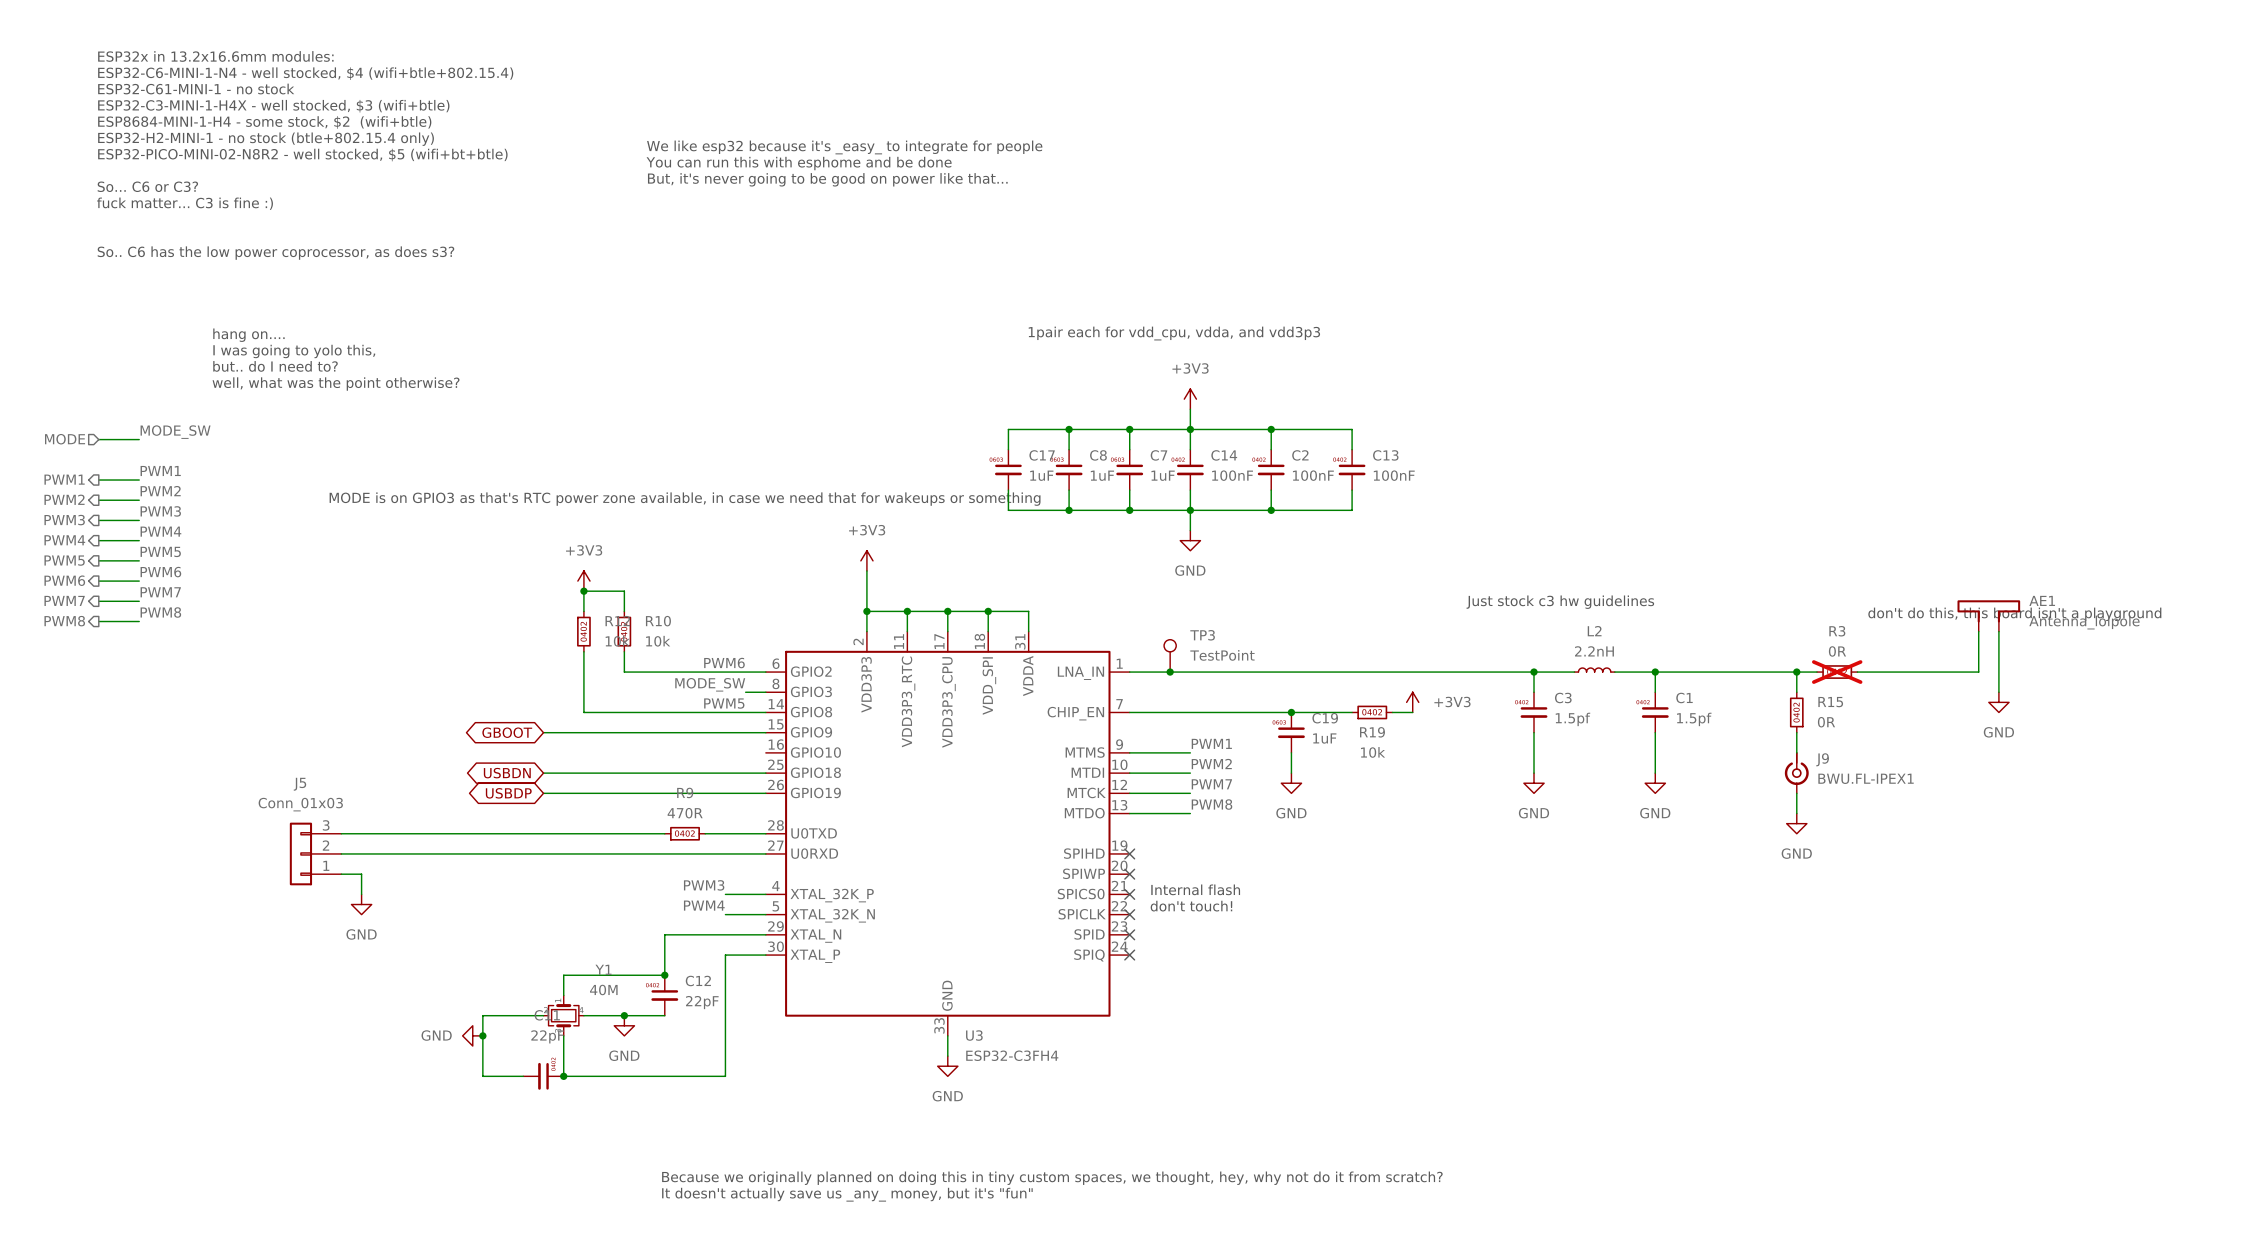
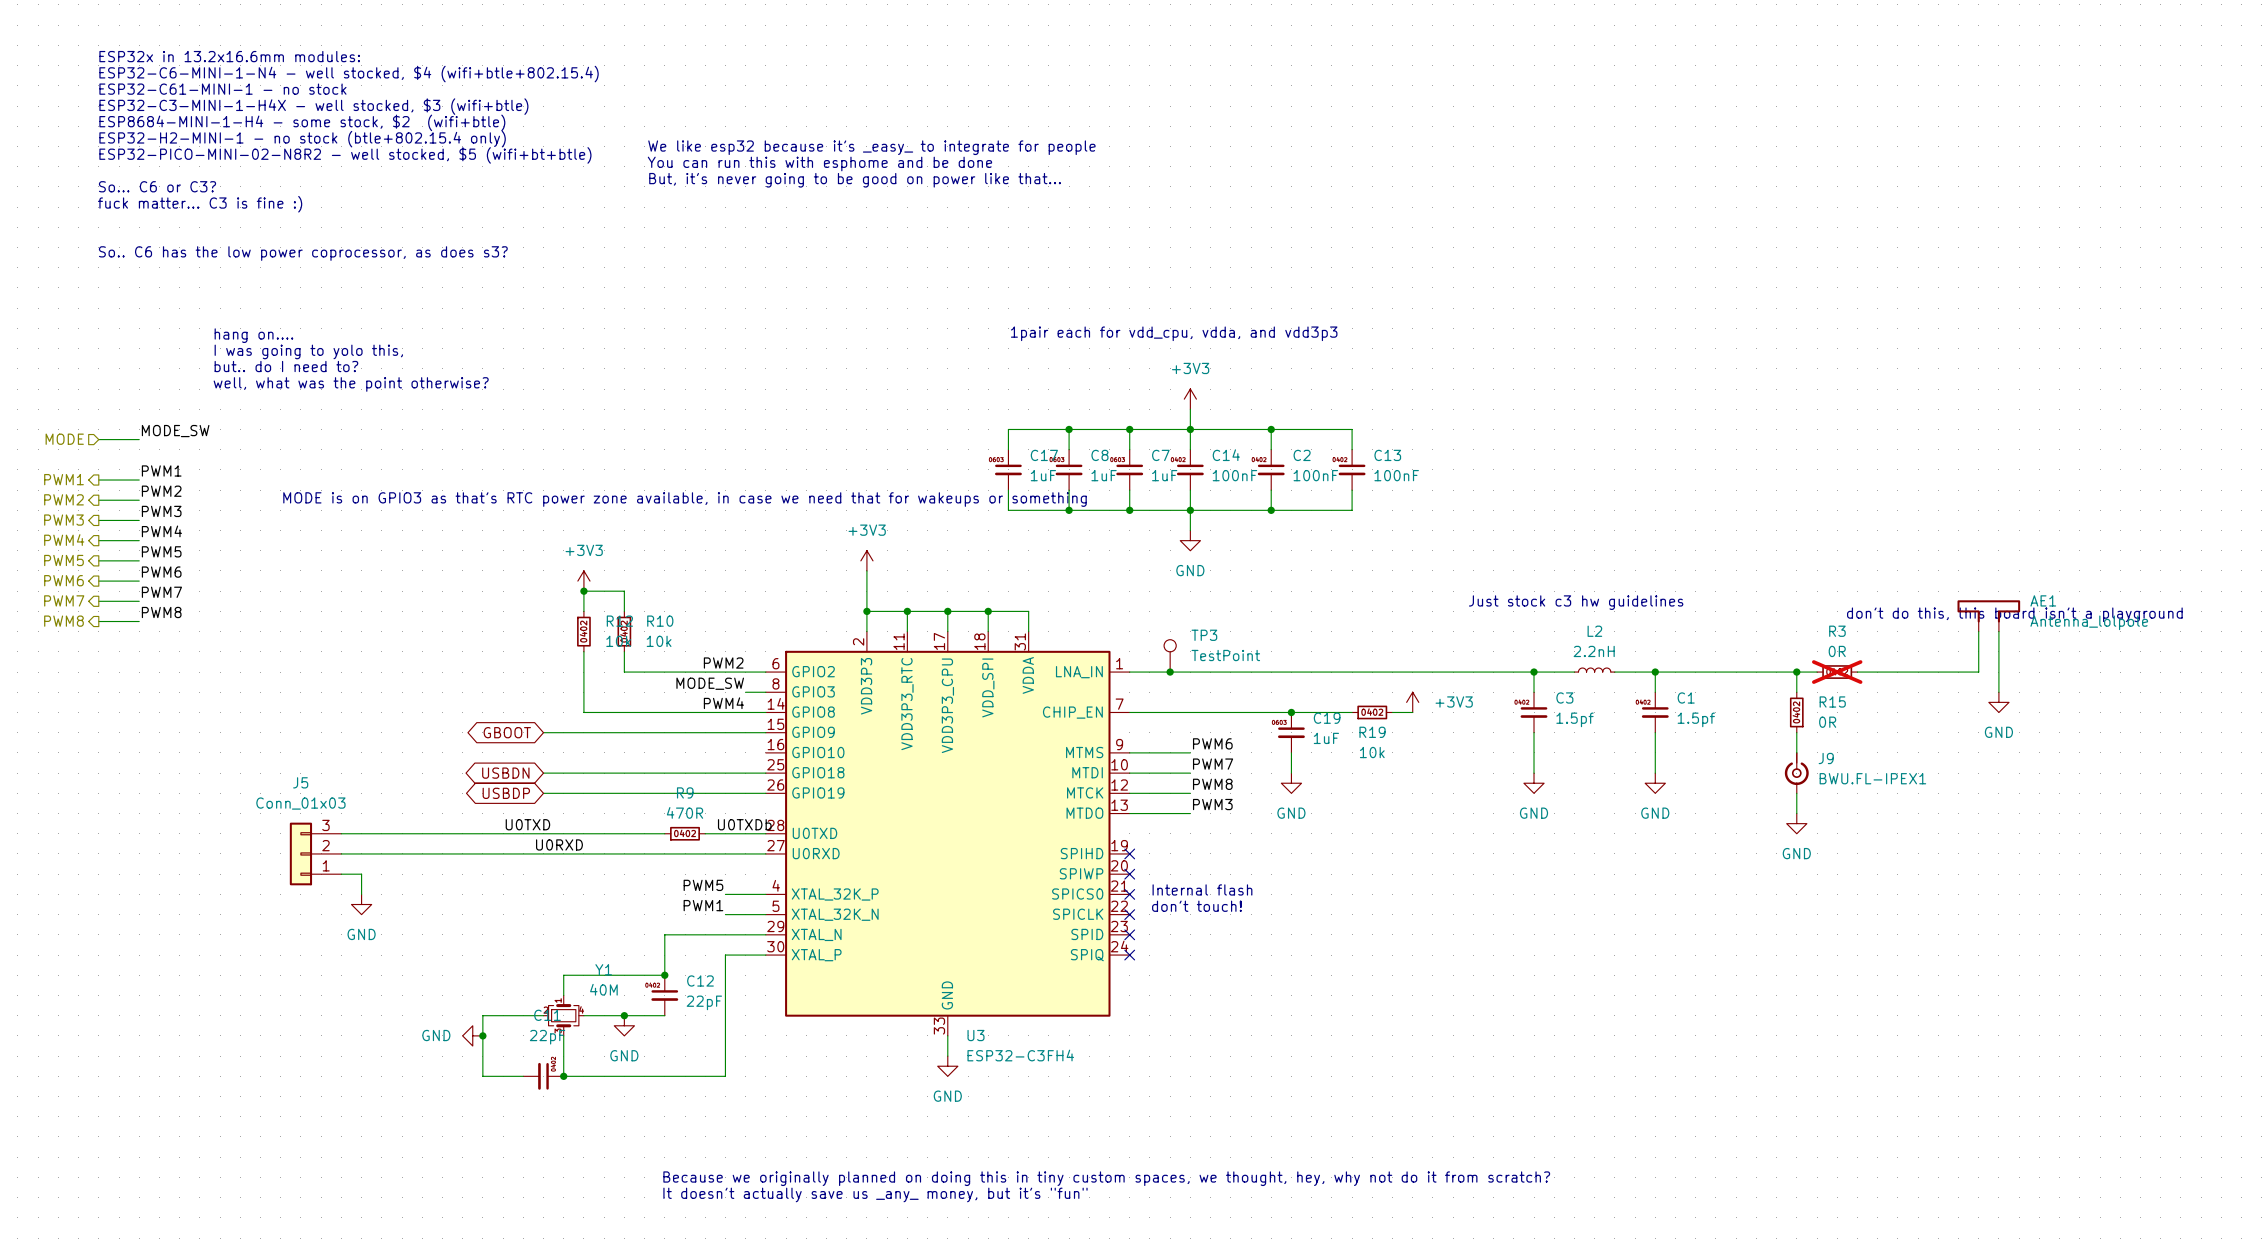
label: PWM6 (724, 663) -> PWM2 (723, 663)
label: PWM5 (724, 703) -> PWM4 (723, 703)
label: PWM1 (1211, 743) -> PWM6 (1212, 743)
label: PWM2 (1211, 764) -> PWM7 (1213, 764)
label: PWM7 (1211, 784) -> PWM8 (1212, 784)
label: PWM8 (1211, 804) -> PWM3 (1212, 804)
label: none -> U0TXD (527, 824)
label: none -> U0TXDb (744, 824)
label: none -> U0RXD (559, 844)
label: PWM3 (704, 885) -> PWM5 (703, 885)
label: PWM4 (704, 905) -> PWM1 (703, 905)

